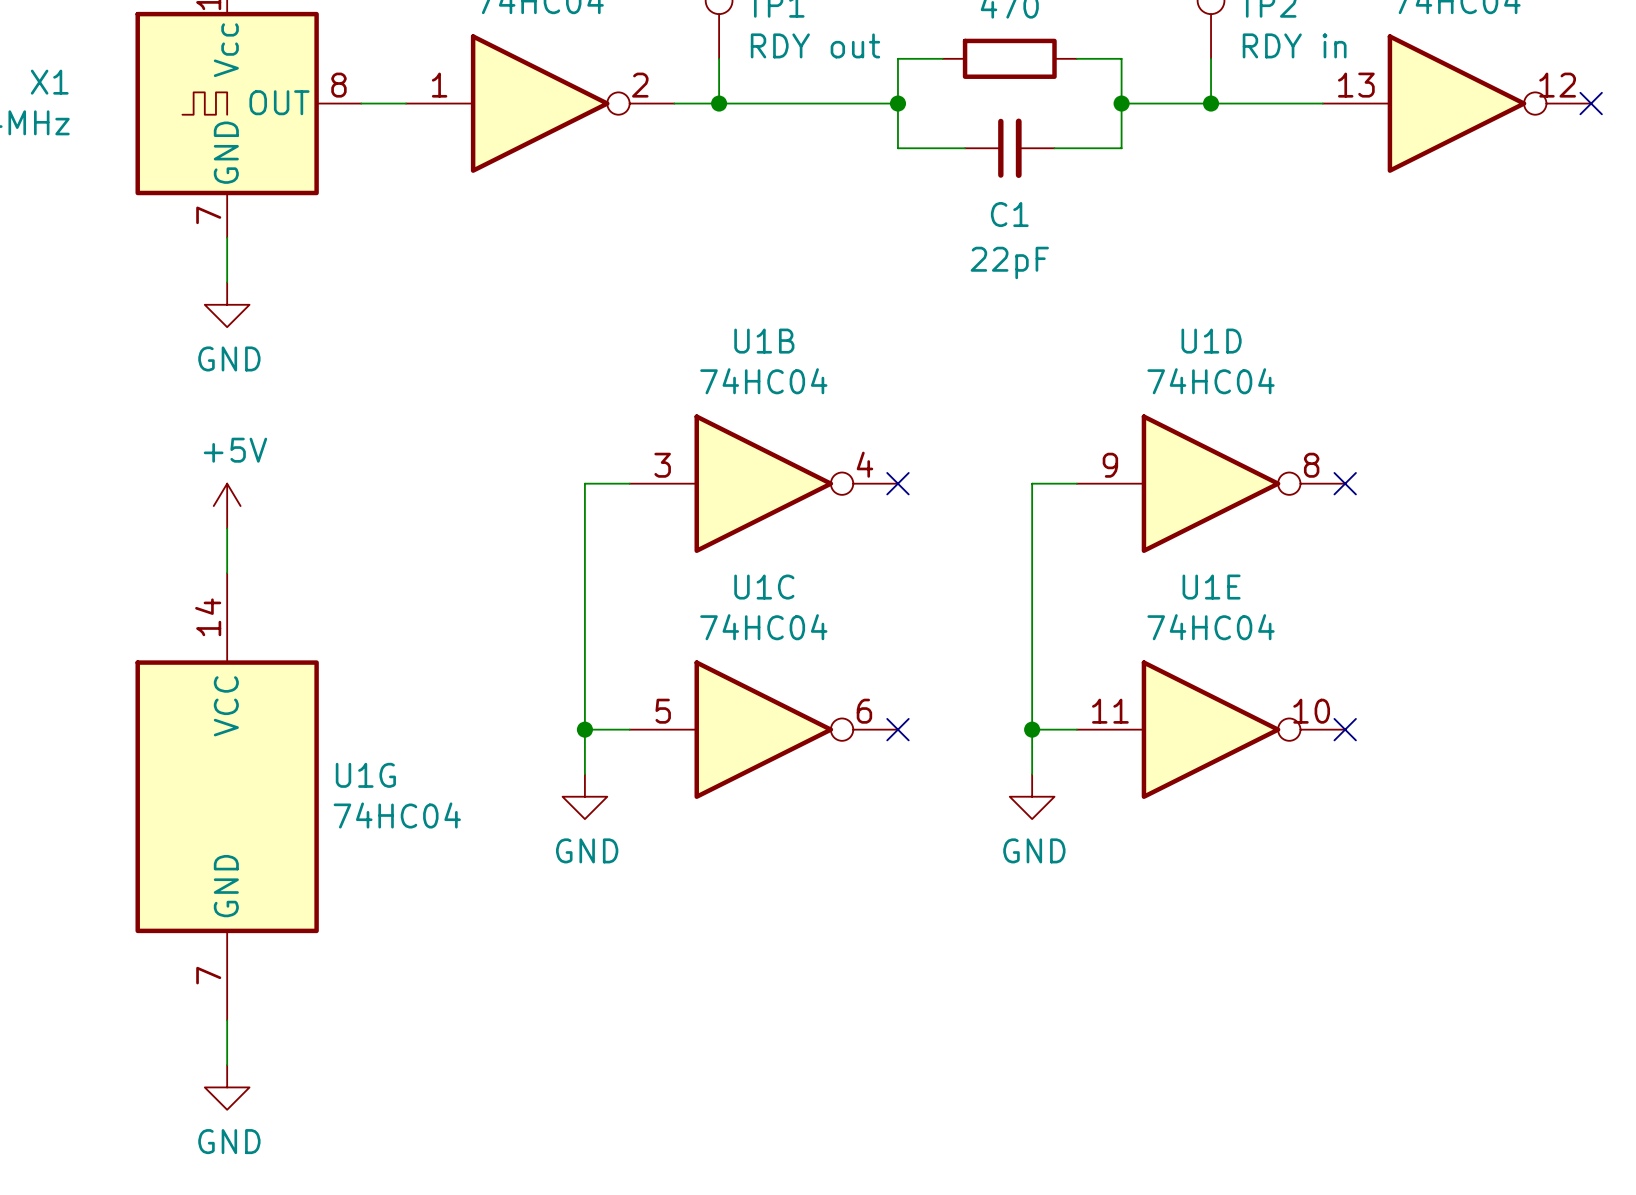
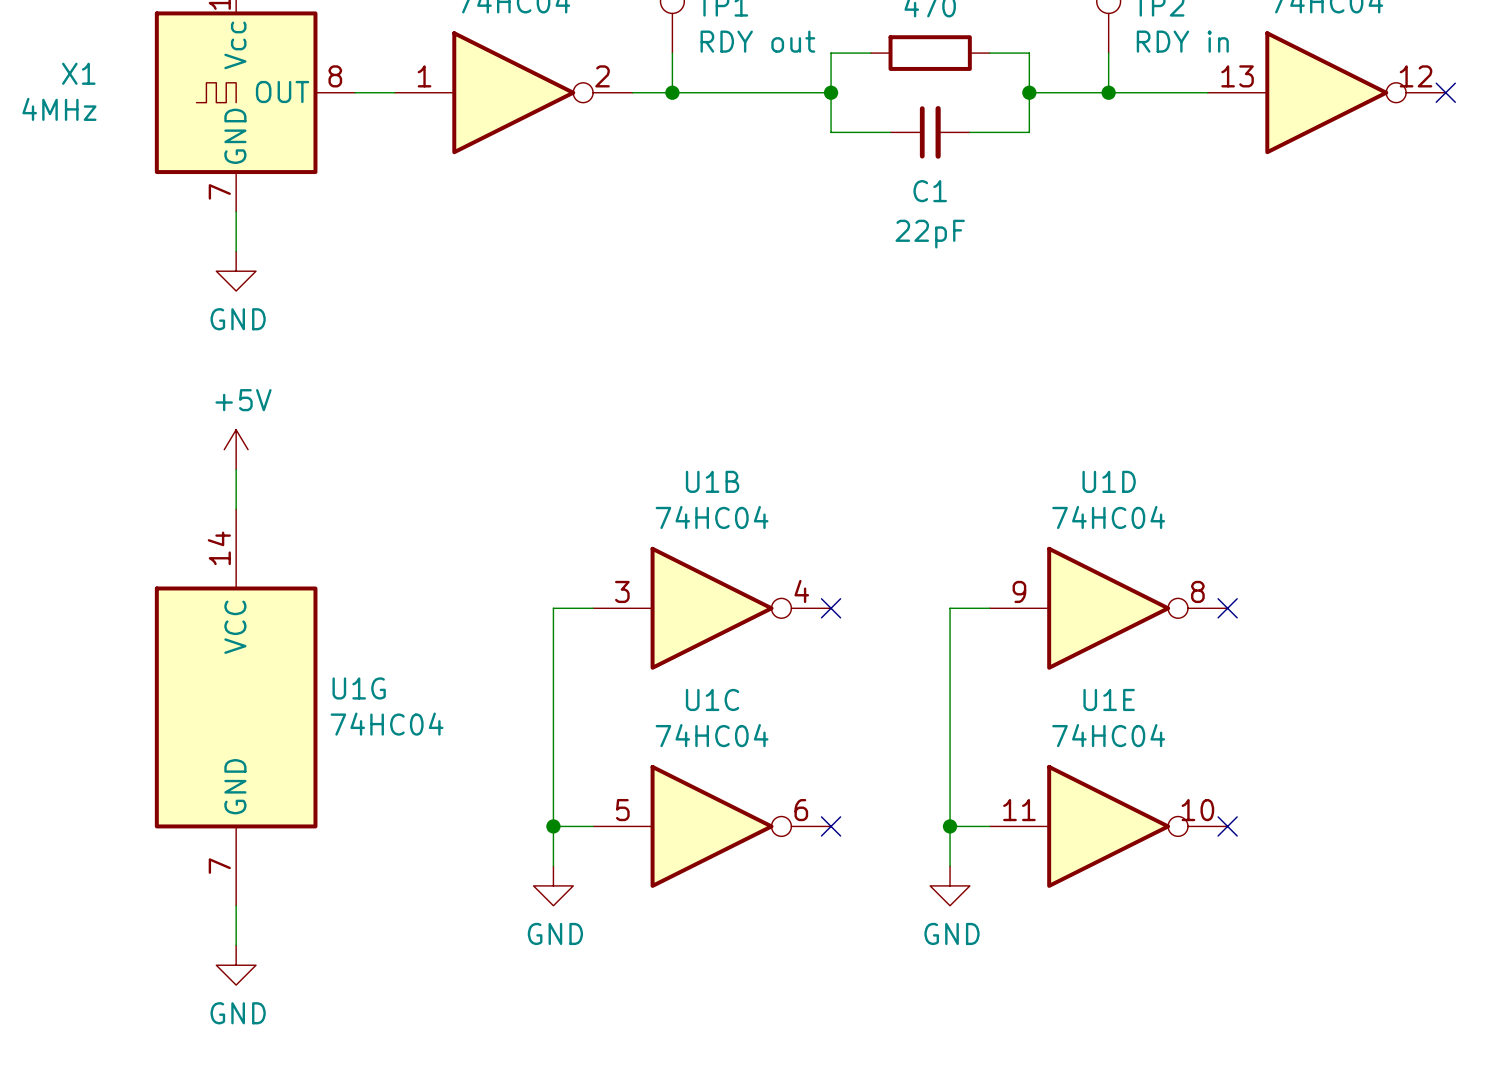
wire: (629, 483) (584, 483) (584, 684) -> (593, 608) (553, 608)
U1B position: (763, 483) -> (712, 608)
no-connect mark: (897, 483) -> none
wire: (1076, 483) (1032, 483) (1032, 684) -> (989, 608) (950, 608)
U1D position: (1211, 483) -> (1108, 608)
no-connect mark: (1345, 483) -> none
wire: (584, 729) (629, 729) -> (553, 826) (593, 826)
junction: (584, 729) -> none
U1C position: (763, 729) -> (712, 826)
no-connect mark position: (897, 729) -> (831, 608)
wire: (1032, 729) (1076, 729) -> (950, 826) (989, 826)
junction: (1032, 729) -> none
U1E position: (1211, 729) -> (1108, 826)
no-connect mark position: (1345, 729) -> (1227, 608)
wire: none -> (553, 687) (553, 866)
wire: none -> (950, 687) (950, 866)
power symbol position: GND (584, 796) -> GND (553, 885)
power symbol position: GND (1032, 796) -> GND (950, 885)
junction: none -> (553, 826)
no-connect mark: none -> (831, 826)
junction: none -> (950, 826)
no-connect mark: none -> (1227, 826)

